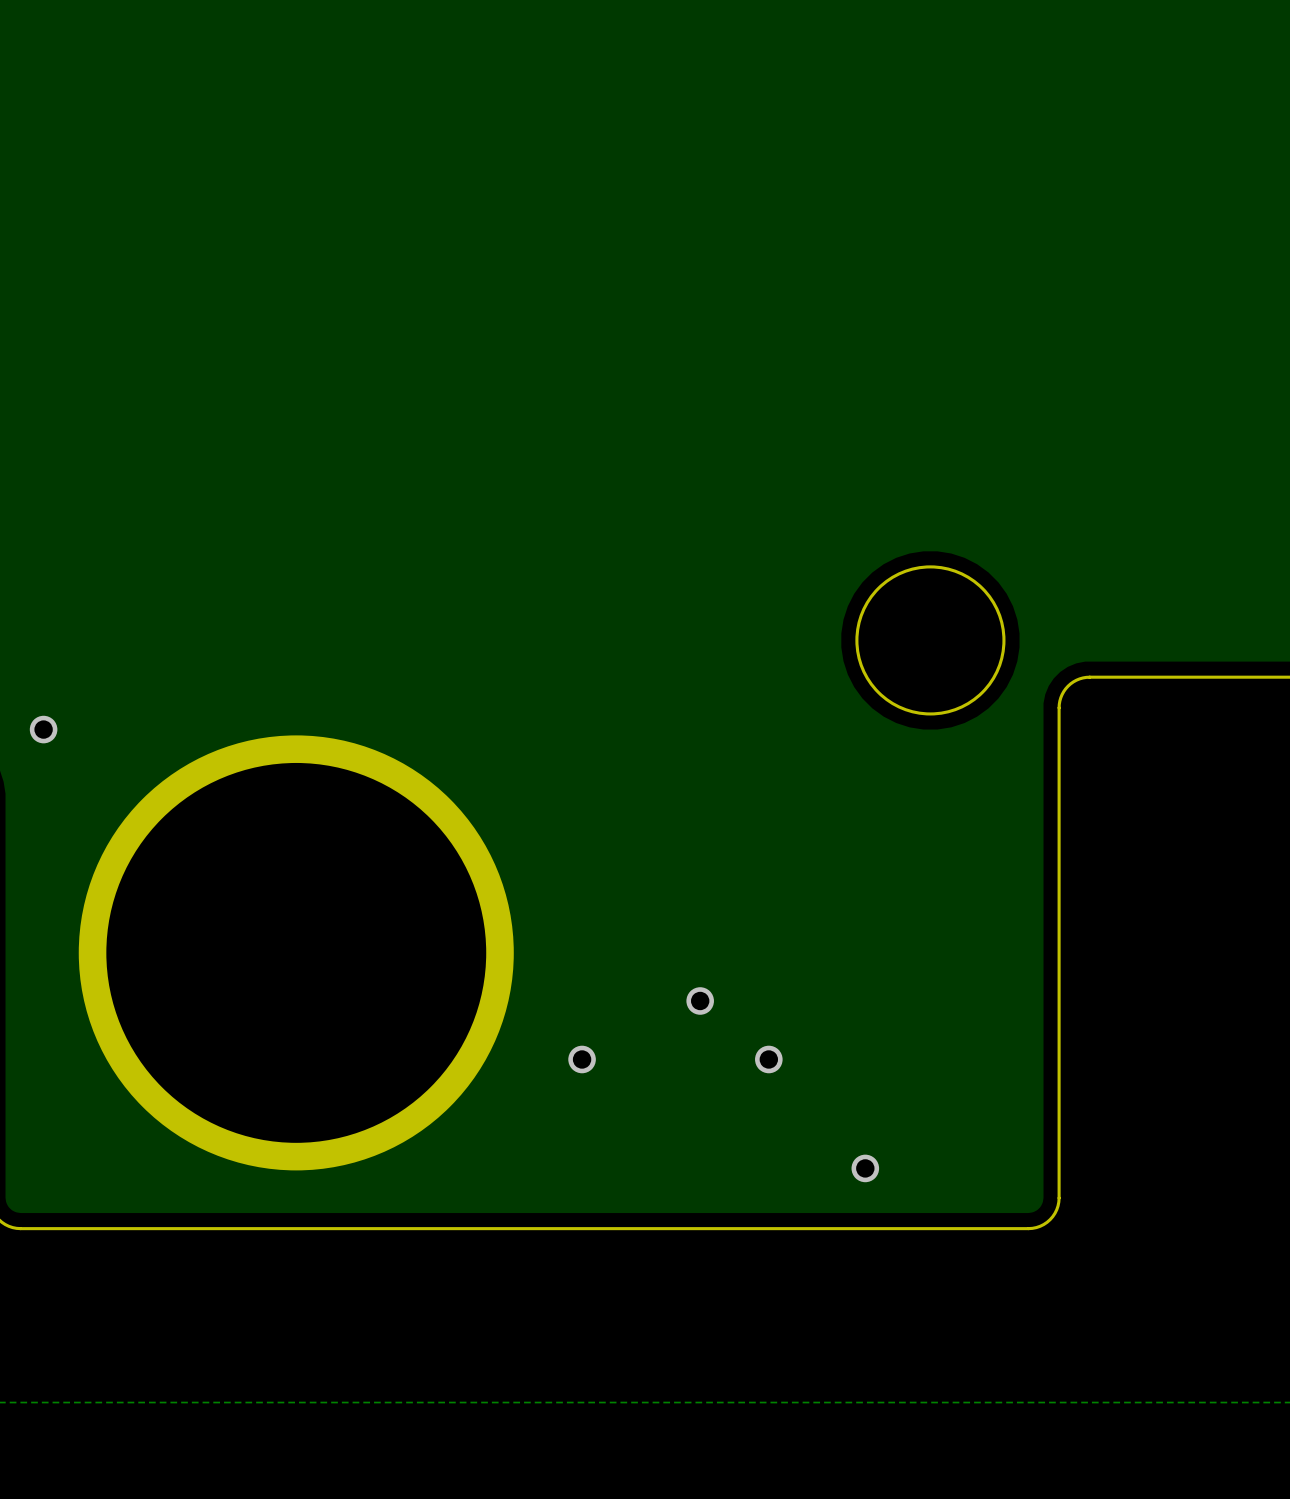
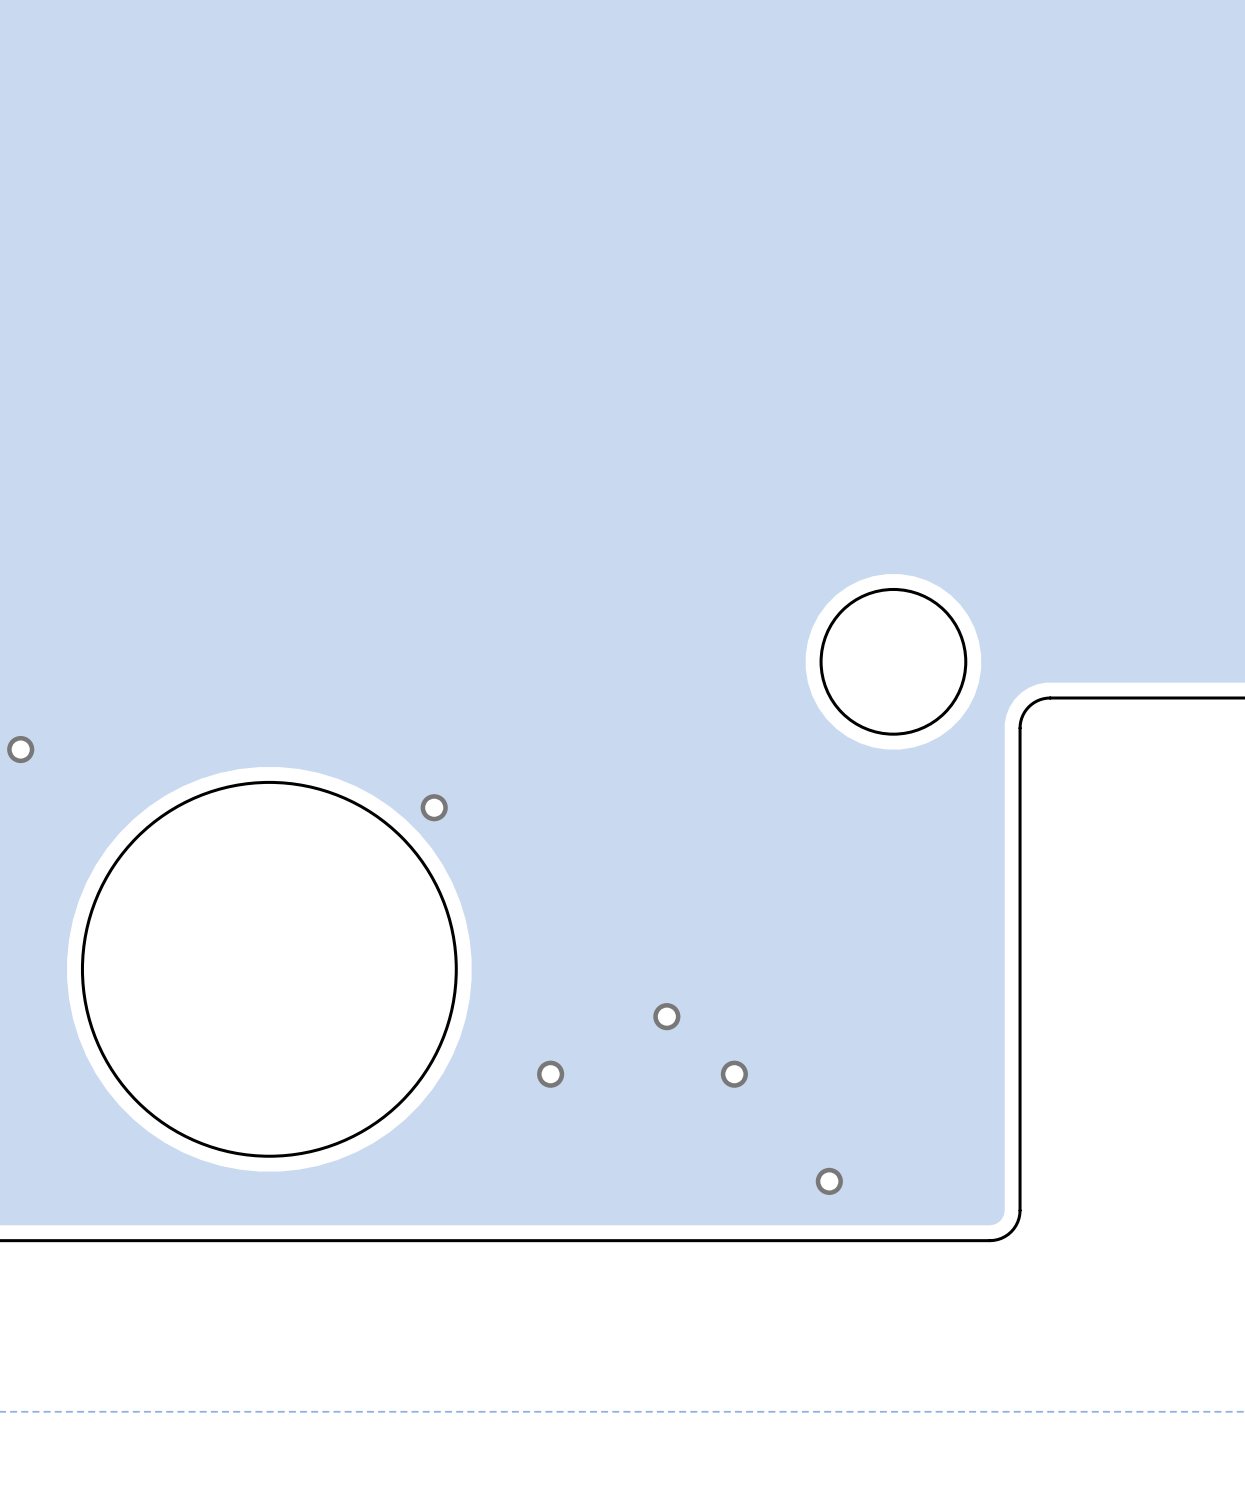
round board edge: none -> [80, 780, 458, 1158]
via: none -> (434, 807)
part: (296, 952) -> none

